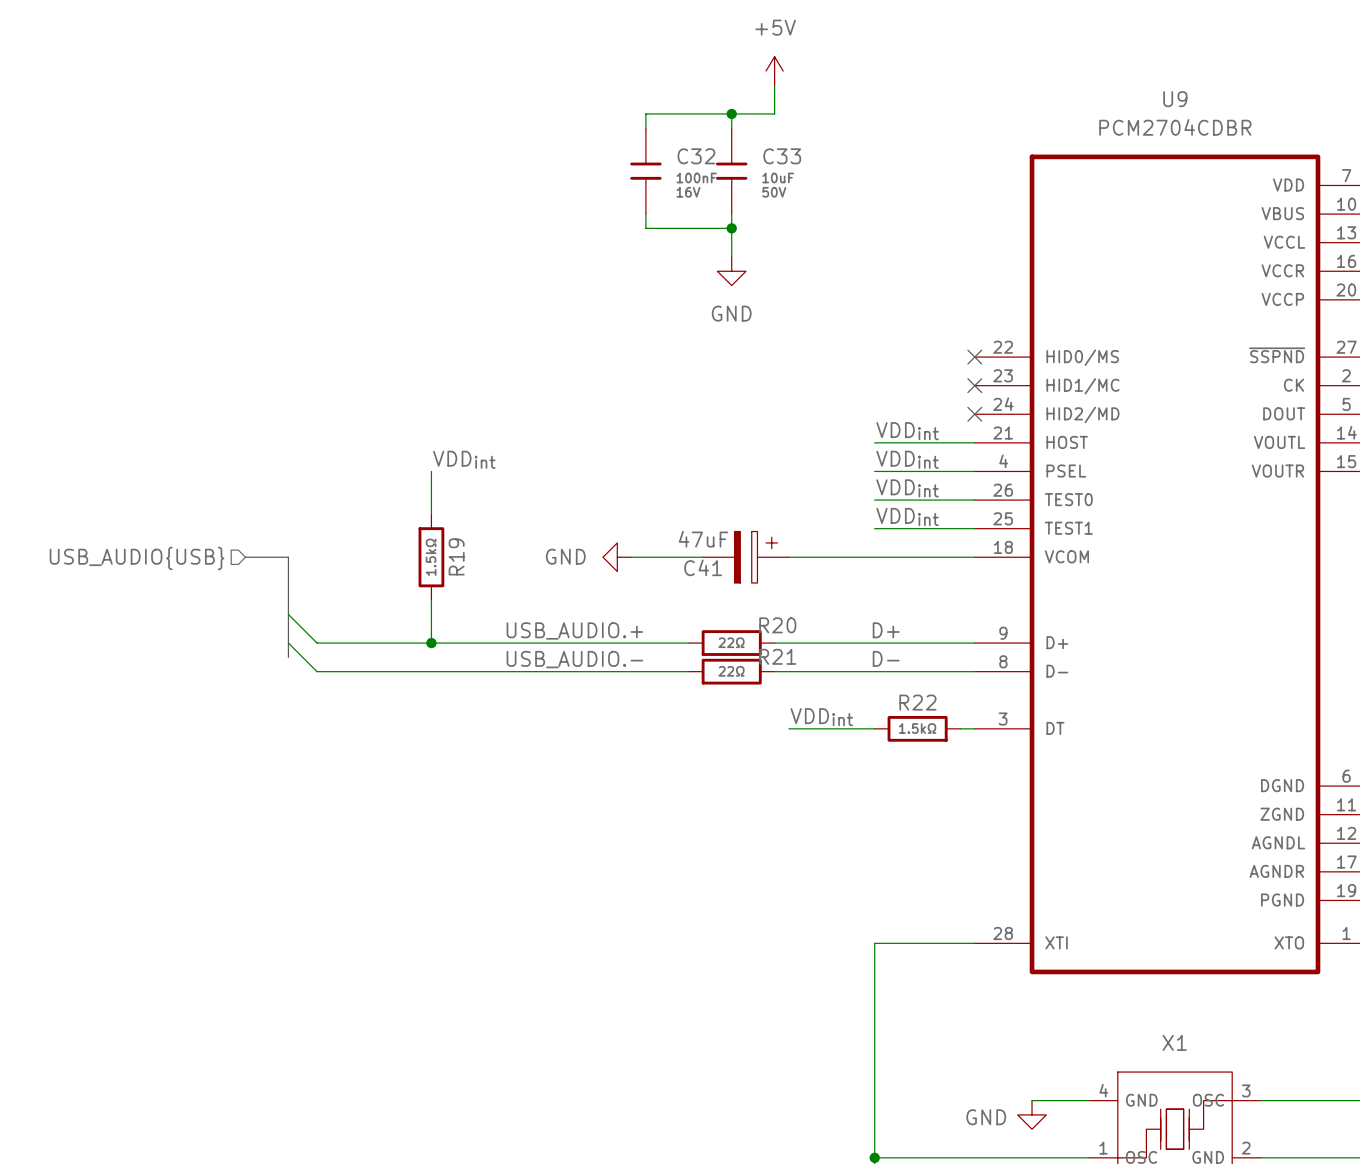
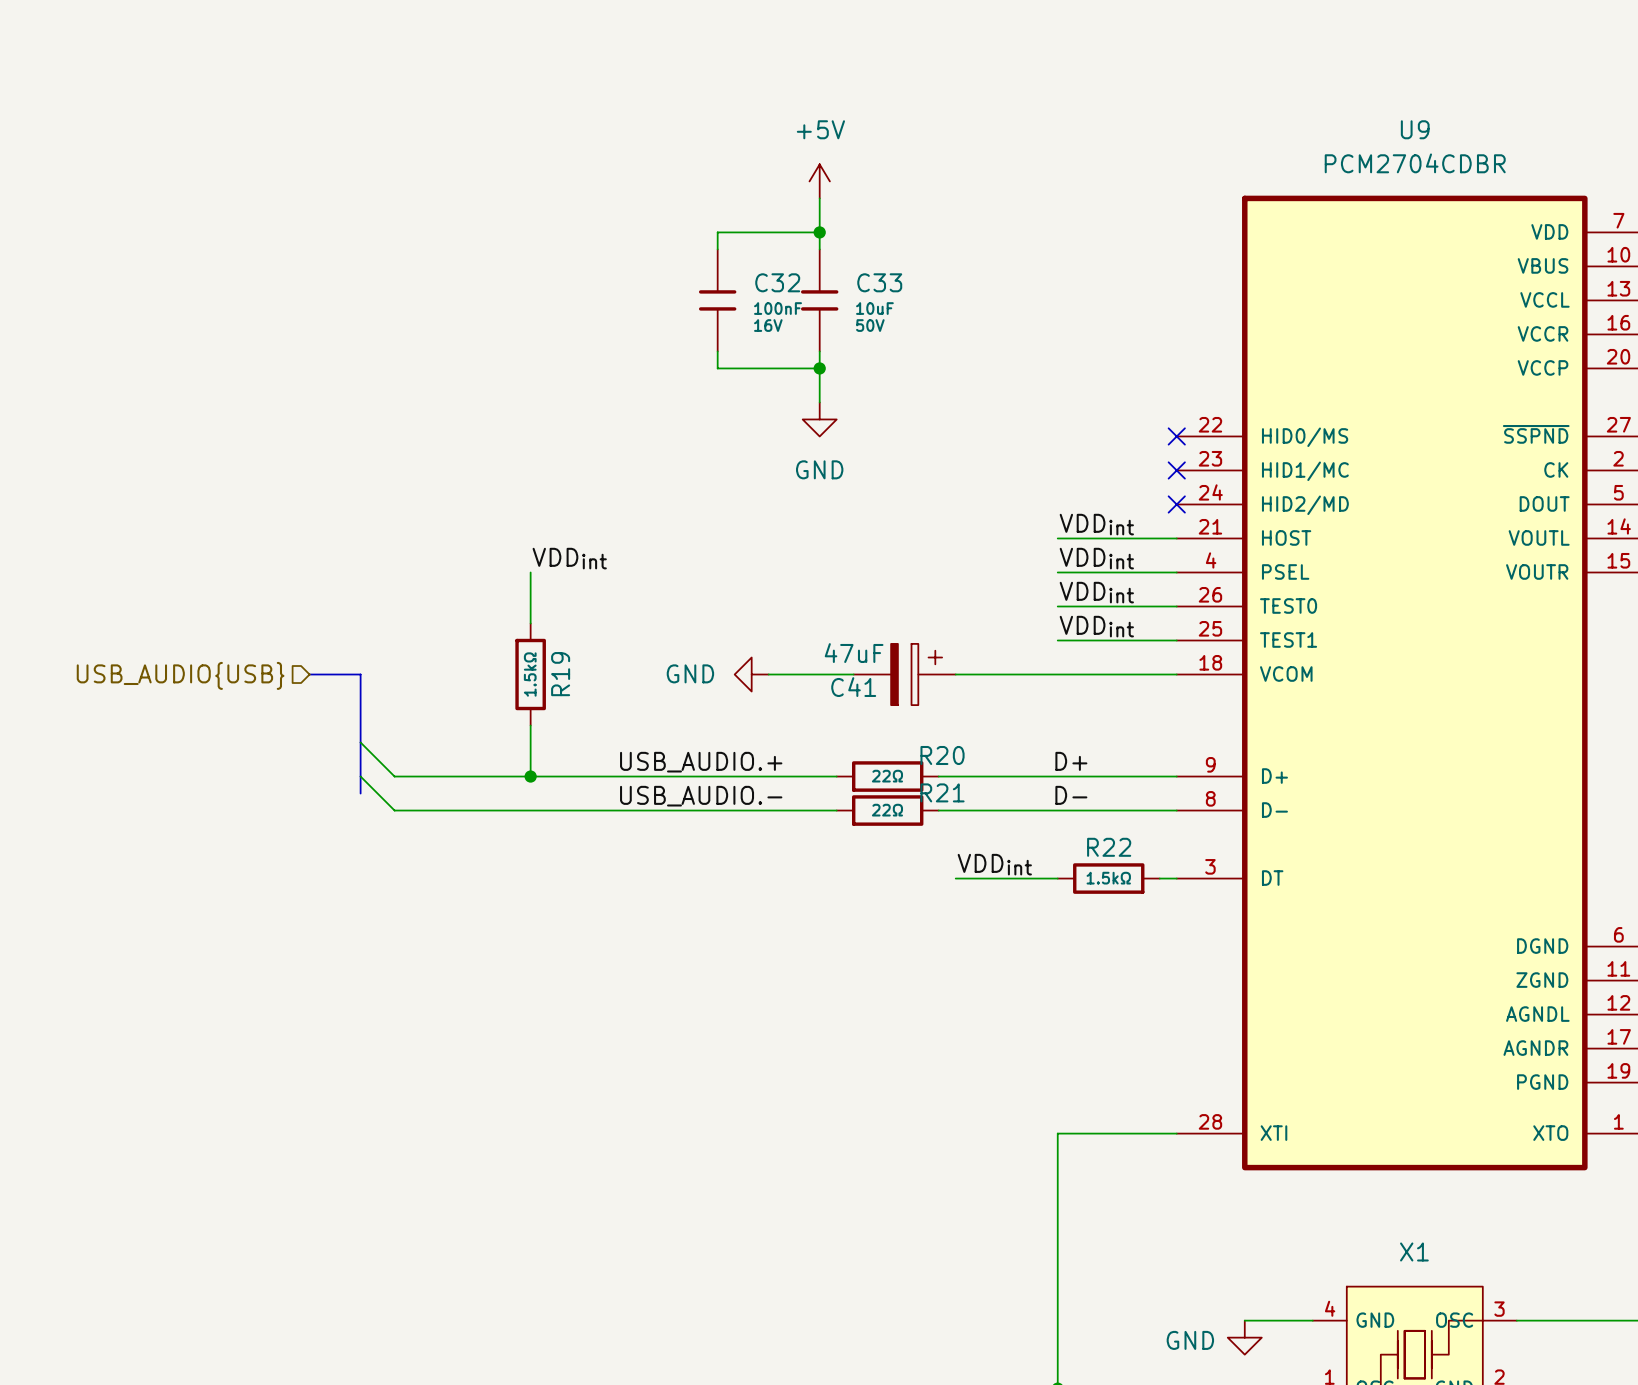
power symbol position: +5V (774, 71) -> +5V (819, 181)
wire: (774, 85) (774, 113) (645, 113) (645, 128) -> none
wire: (731, 113) (731, 128) -> none
junction: (731, 113) -> none
wire: none -> (819, 198) (819, 249)
C32 position: (645, 171) -> (717, 300)
C33 position: (731, 171) -> (819, 300)
wire: none -> (819, 232) (717, 232) (717, 249)
junction: none -> (819, 232)
wire: (645, 214) (645, 228) (731, 228) -> (717, 351) (717, 368) (819, 368)
wire: (731, 214) (731, 256) -> (819, 351) (819, 402)
junction: (731, 228) -> none
power symbol position: GND (731, 271) -> GND (819, 419)
junction: none -> (819, 368)

